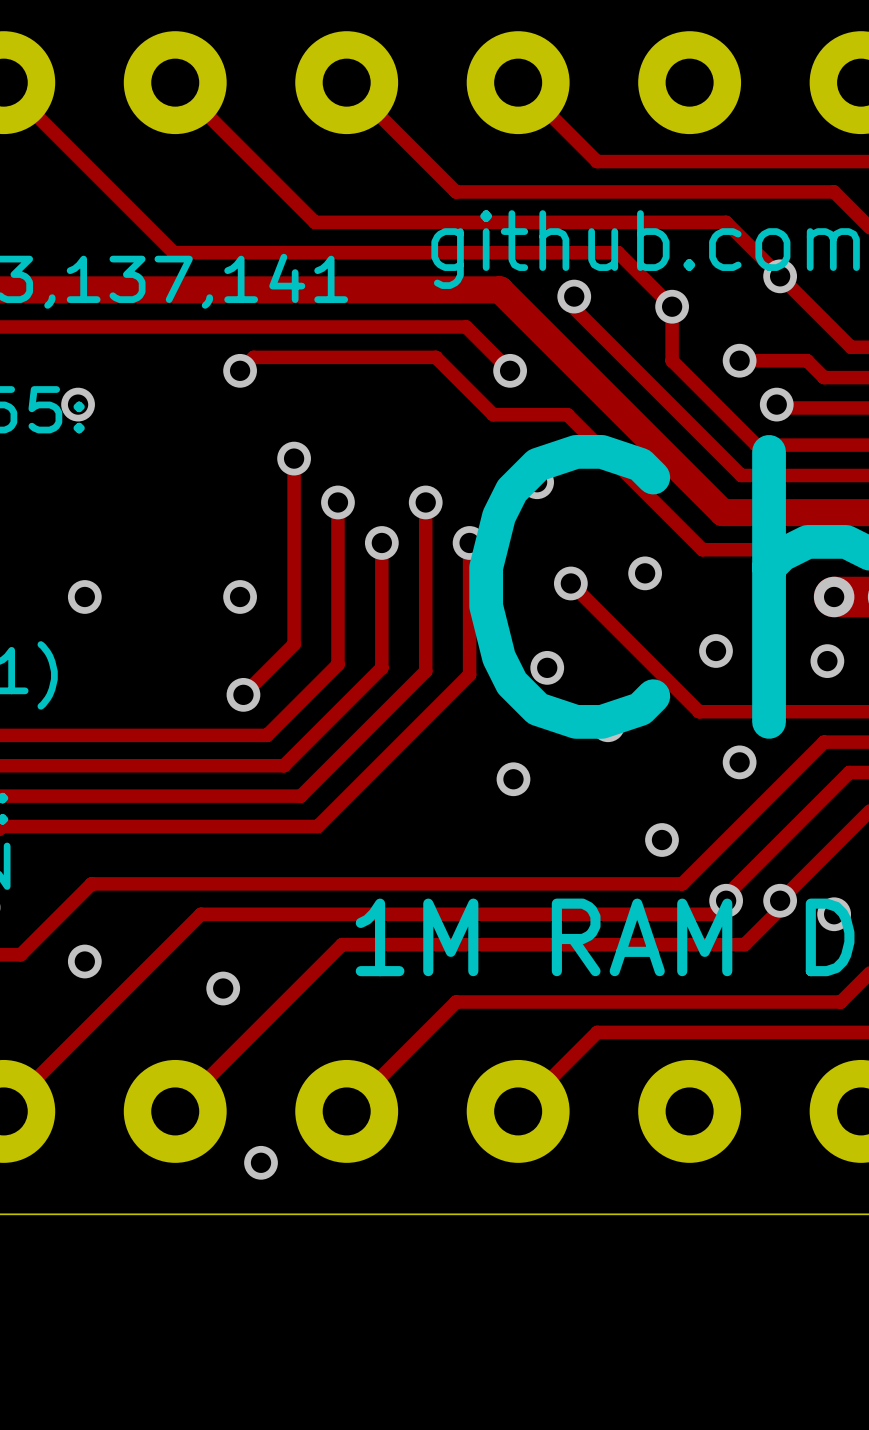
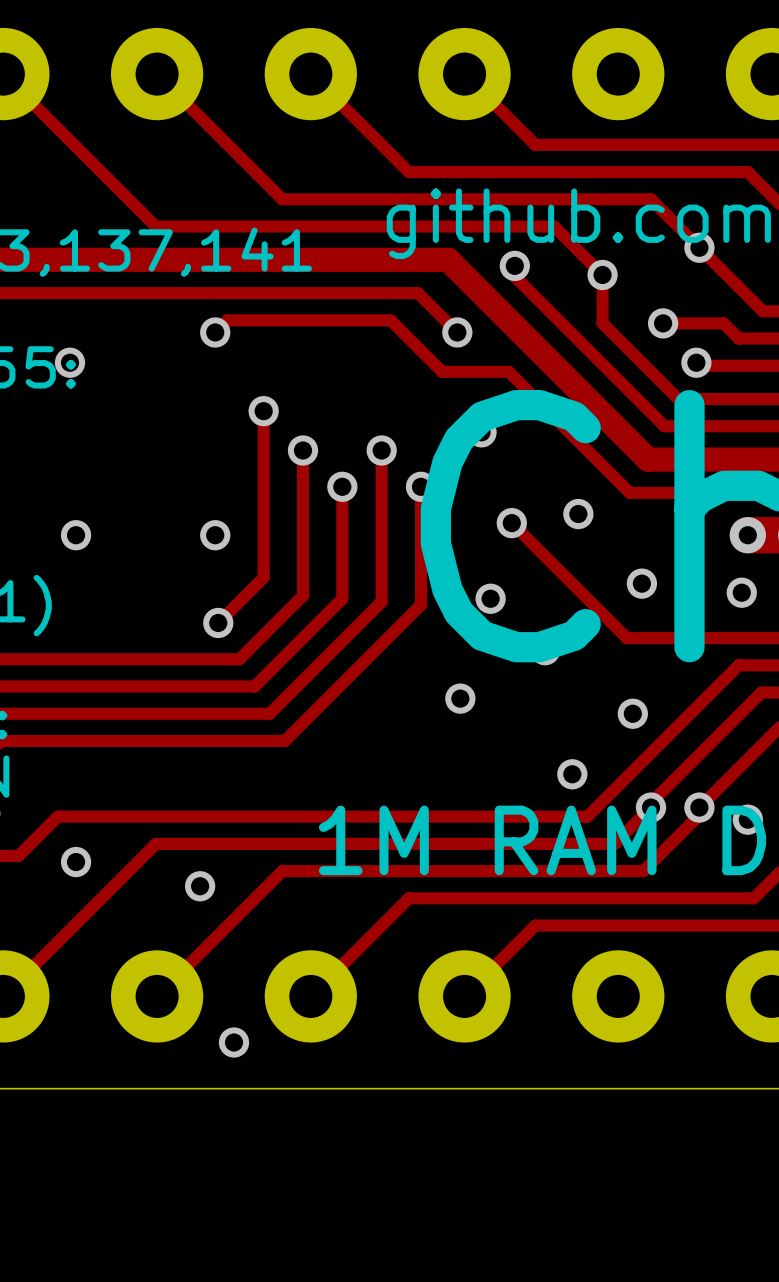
via position: (739, 762) -> (632, 713)
via position: (661, 840) -> (572, 774)
track: (682, 883) (91, 883) (64, 910) -> (611, 792) (587, 816) (57, 816)
track: (712, 914) (200, 914) (173, 941) -> (638, 819) (614, 843) (155, 843)
track: (744, 944) (342, 944) (315, 971) -> (667, 846) (643, 871) (282, 871)

